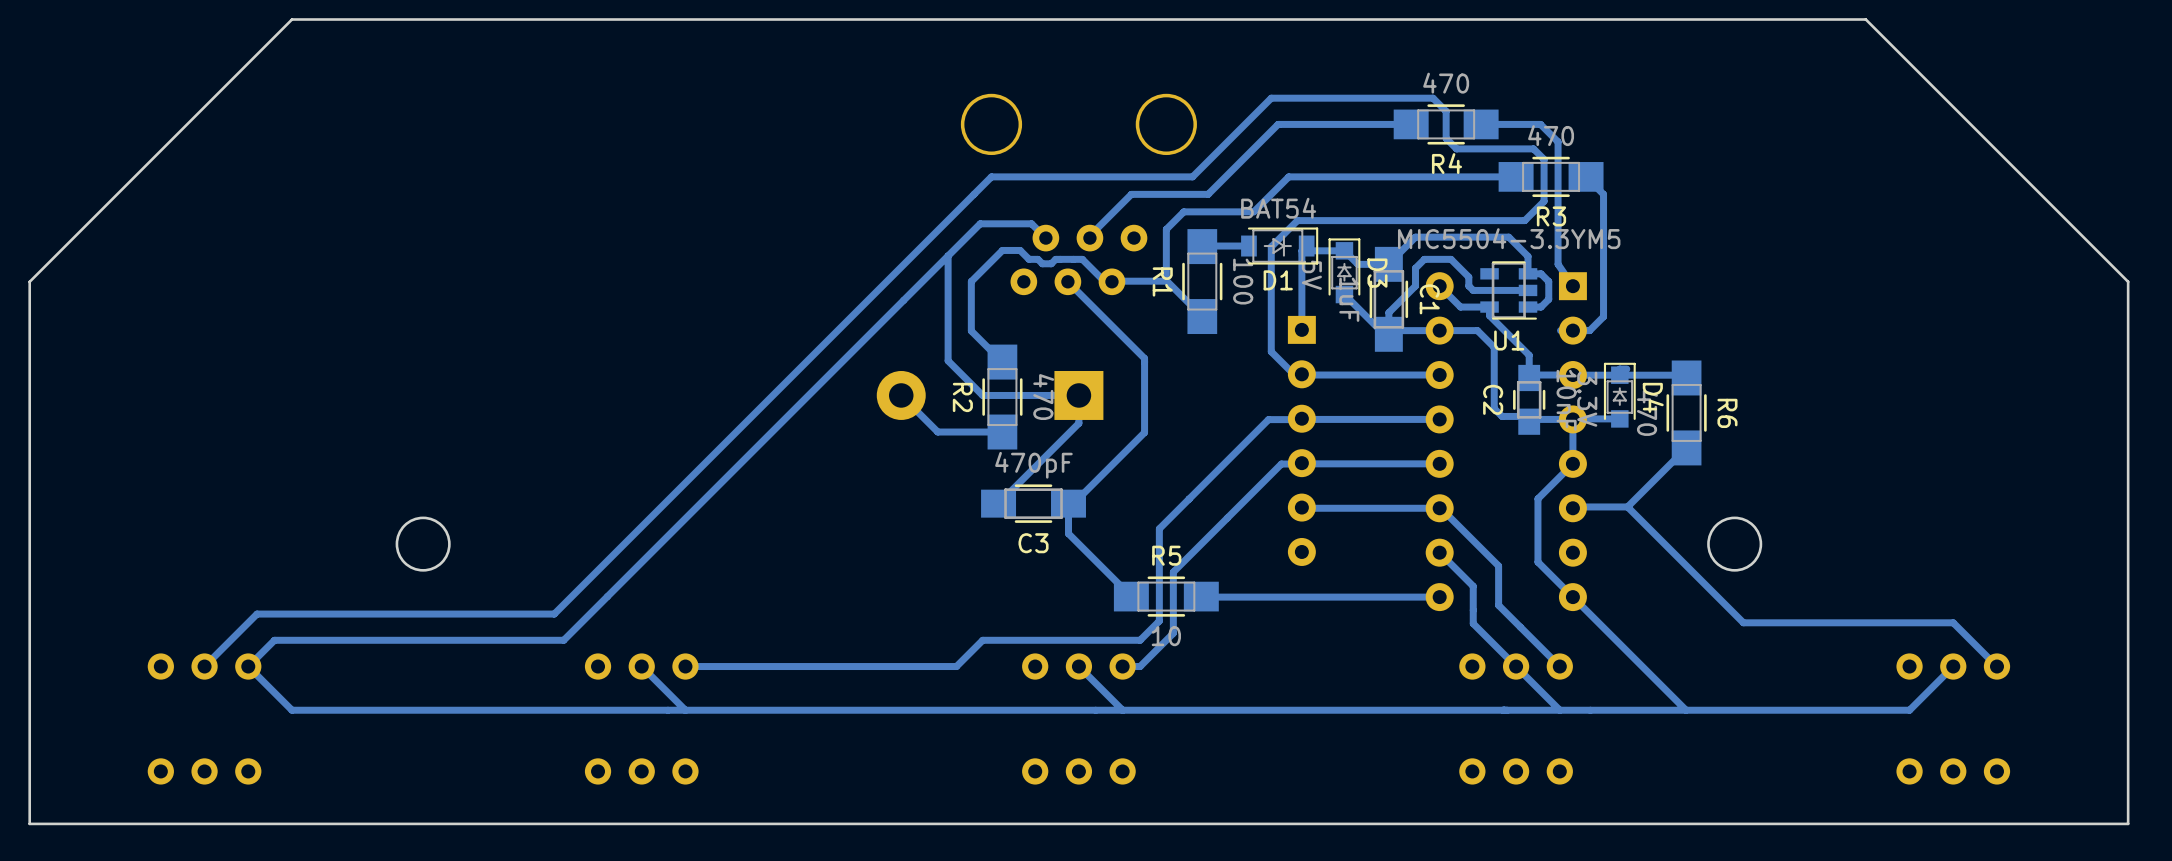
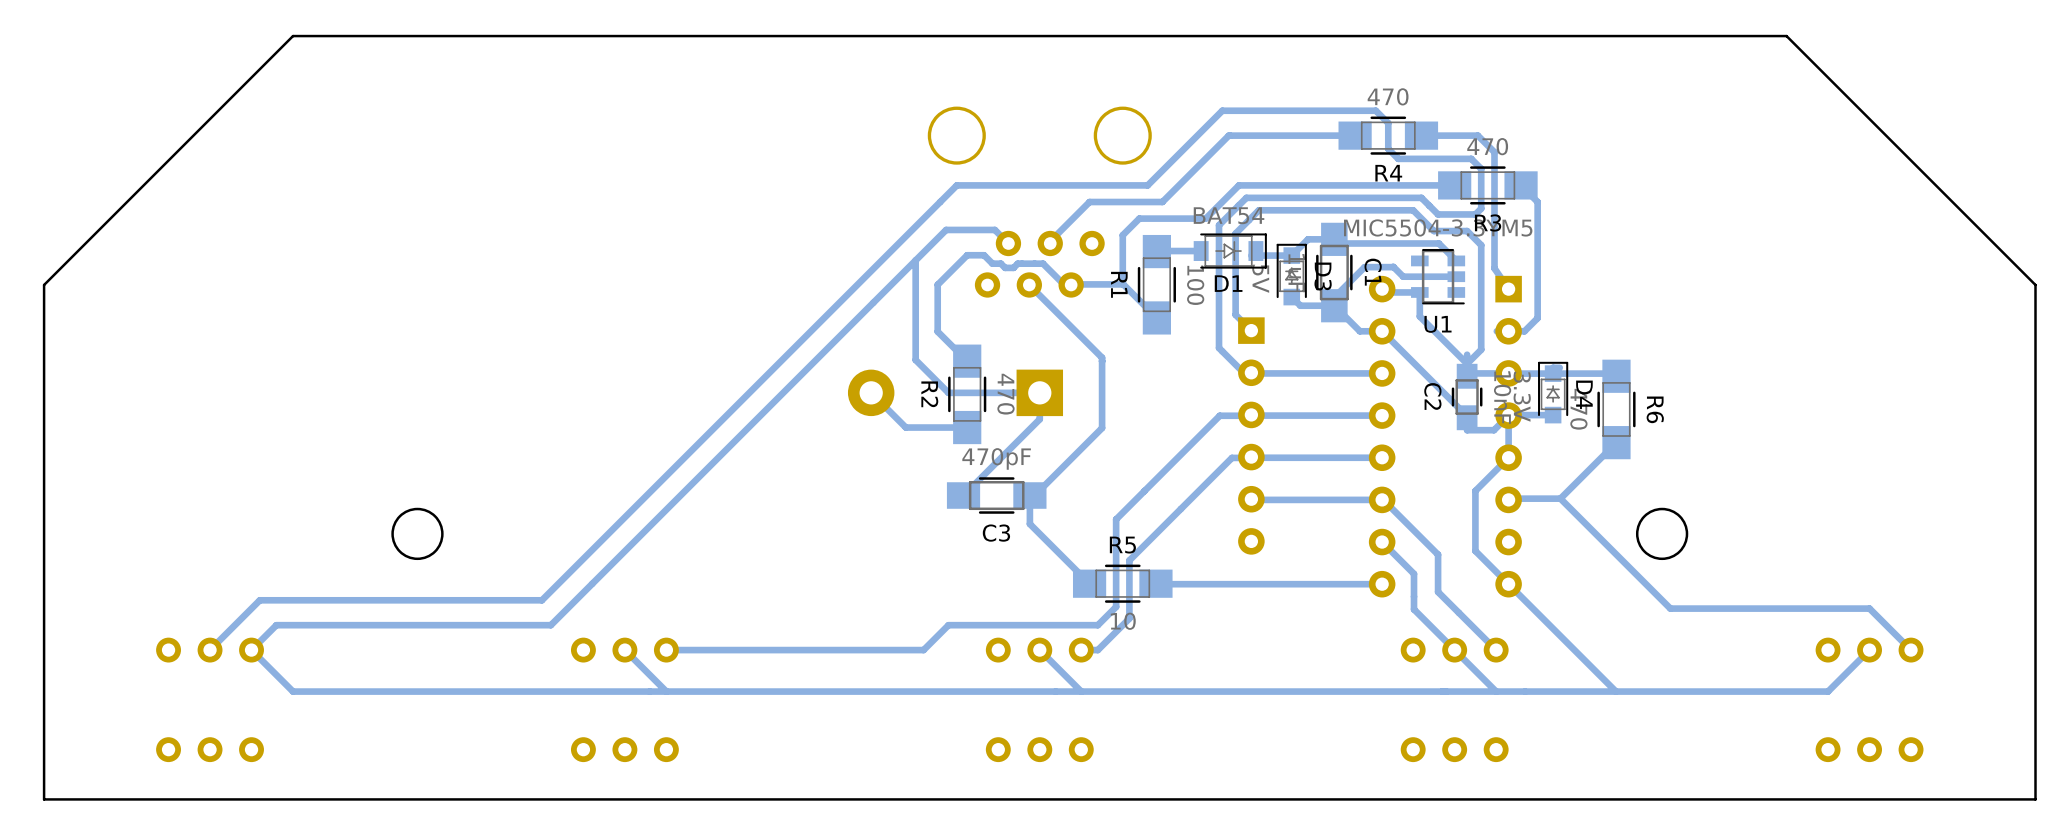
bottom track: (1537, 207) (1524, 220) (1297, 220) (1271, 246) (1271, 351) -> (1475, 214) (1438, 214) (1421, 197) (1246, 197) (1219, 225) (1219, 348) (1222, 351)
bottom track: (1301, 250) (1301, 329) -> (1385, 292) (1419, 292) (1419, 316) (1467, 363) (1481, 349) (1481, 245) (1467, 231) (1433, 231) (1413, 210) (1258, 210) (1235, 233) (1235, 314) (1251, 330)
bottom track: (1344, 250) (1357, 264) (1388, 264) (1415, 237) (1508, 237) (1528, 256) (1528, 273) (1541, 273) (1548, 281) (1548, 299) (1541, 307) (1528, 307) -> (1291, 255) (1308, 239) (1334, 239) (1338, 243) (1438, 243) (1456, 260)
bottom track: none -> (1393, 266) (1403, 276) (1456, 276)
bottom track: none -> (1393, 267) (1364, 267) (1334, 297)
bottom track: (1443, 289) (1460, 307) (1489, 307) (1489, 315) (1529, 355) -> none
U1 position: (1508, 290) -> (1438, 276)
bottom track: (1528, 290) (1473, 290) (1468, 286) (1468, 277) (1451, 259) (1424, 259) (1415, 268) (1415, 286) (1388, 312) (1388, 334) -> none
C1 position: (1388, 299) -> (1334, 272)
bottom track: (1353, 303) (1384, 334) (1388, 334) -> none
bottom track: (1388, 334) (1392, 330) (1477, 330) (1494, 347) (1494, 408) (1502, 416) (1529, 416) (1532, 419) (1572, 419) -> (1300, 305) (1334, 305) (1359, 331) (1382, 331) (1467, 416) (1467, 430) (1494, 430) (1508, 415)

